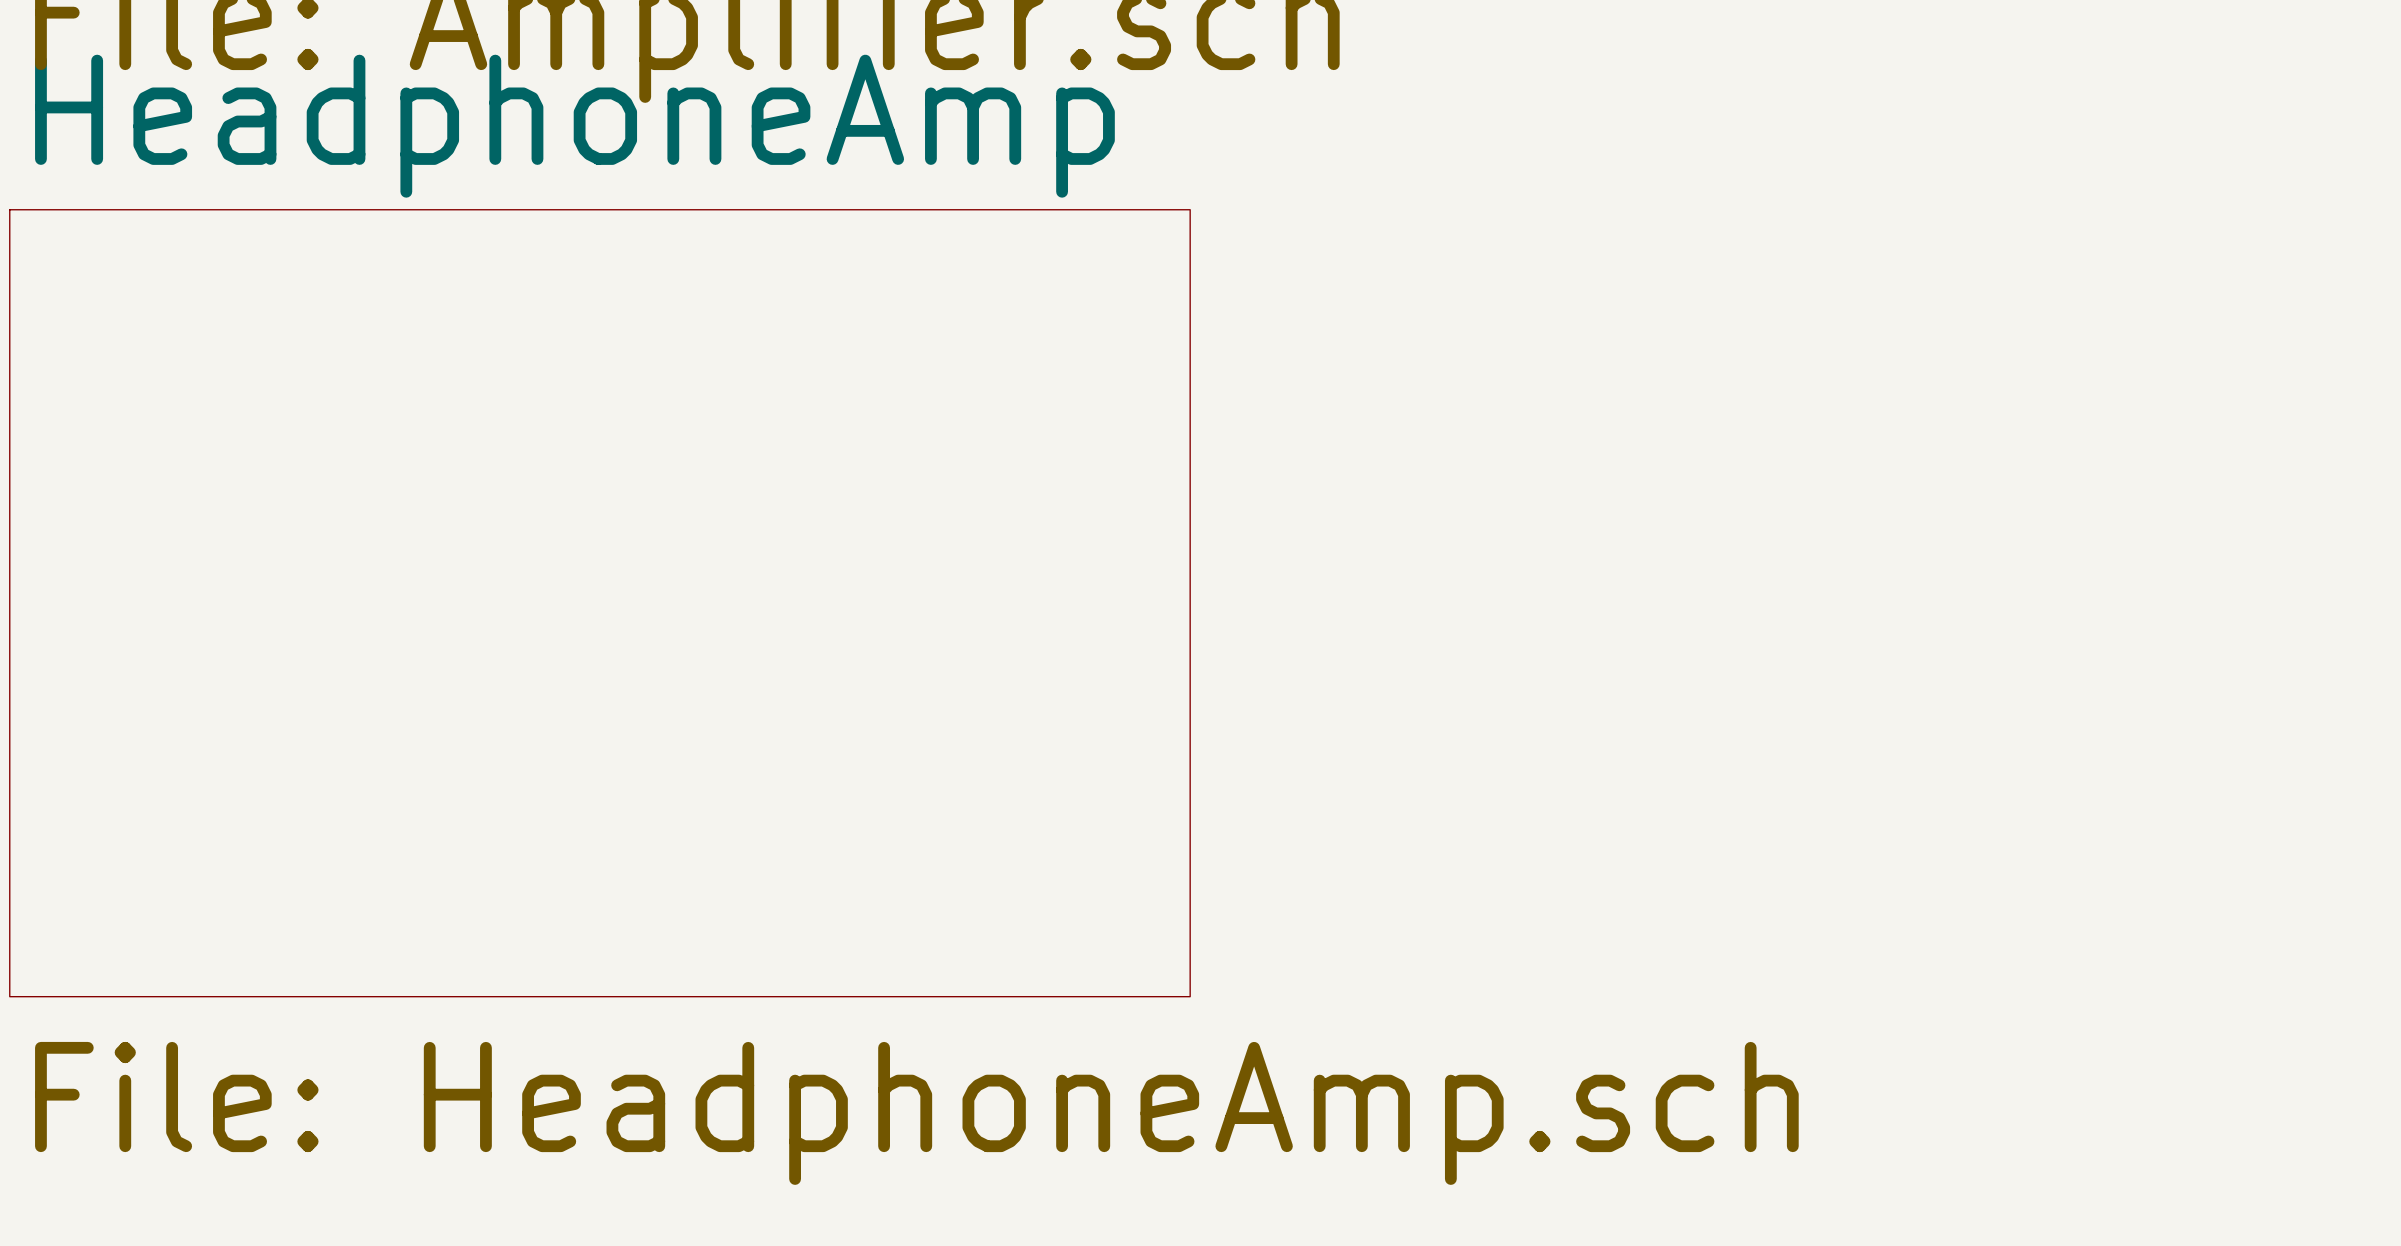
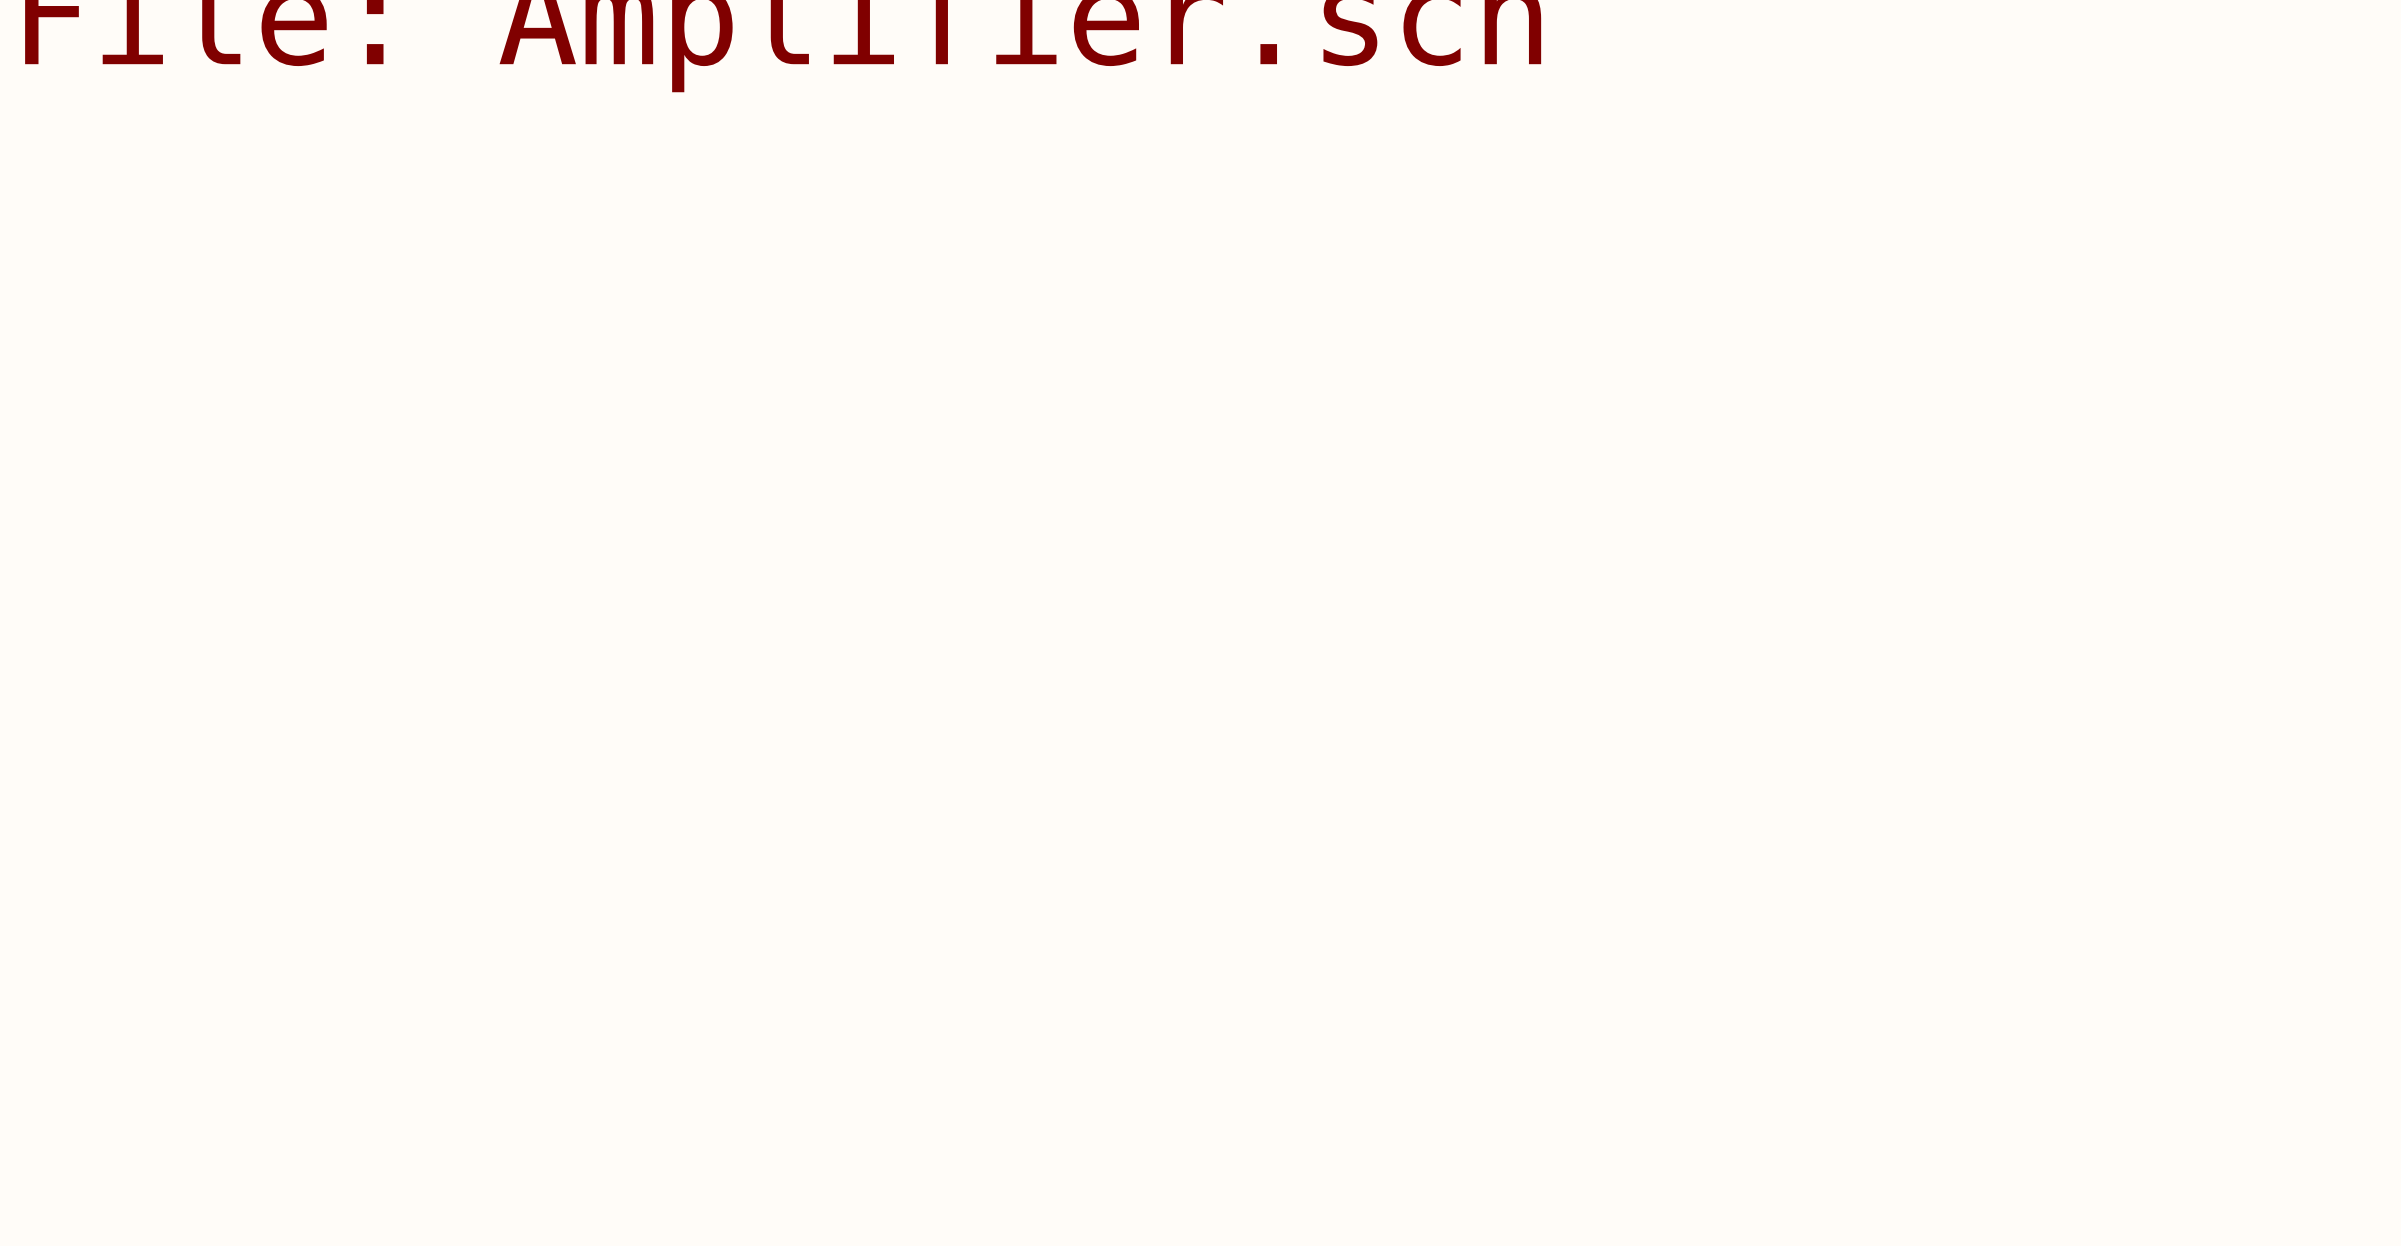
sheet HeadphoneAmp: File: HeadphoneAmp.sch (599, 603) -> none

